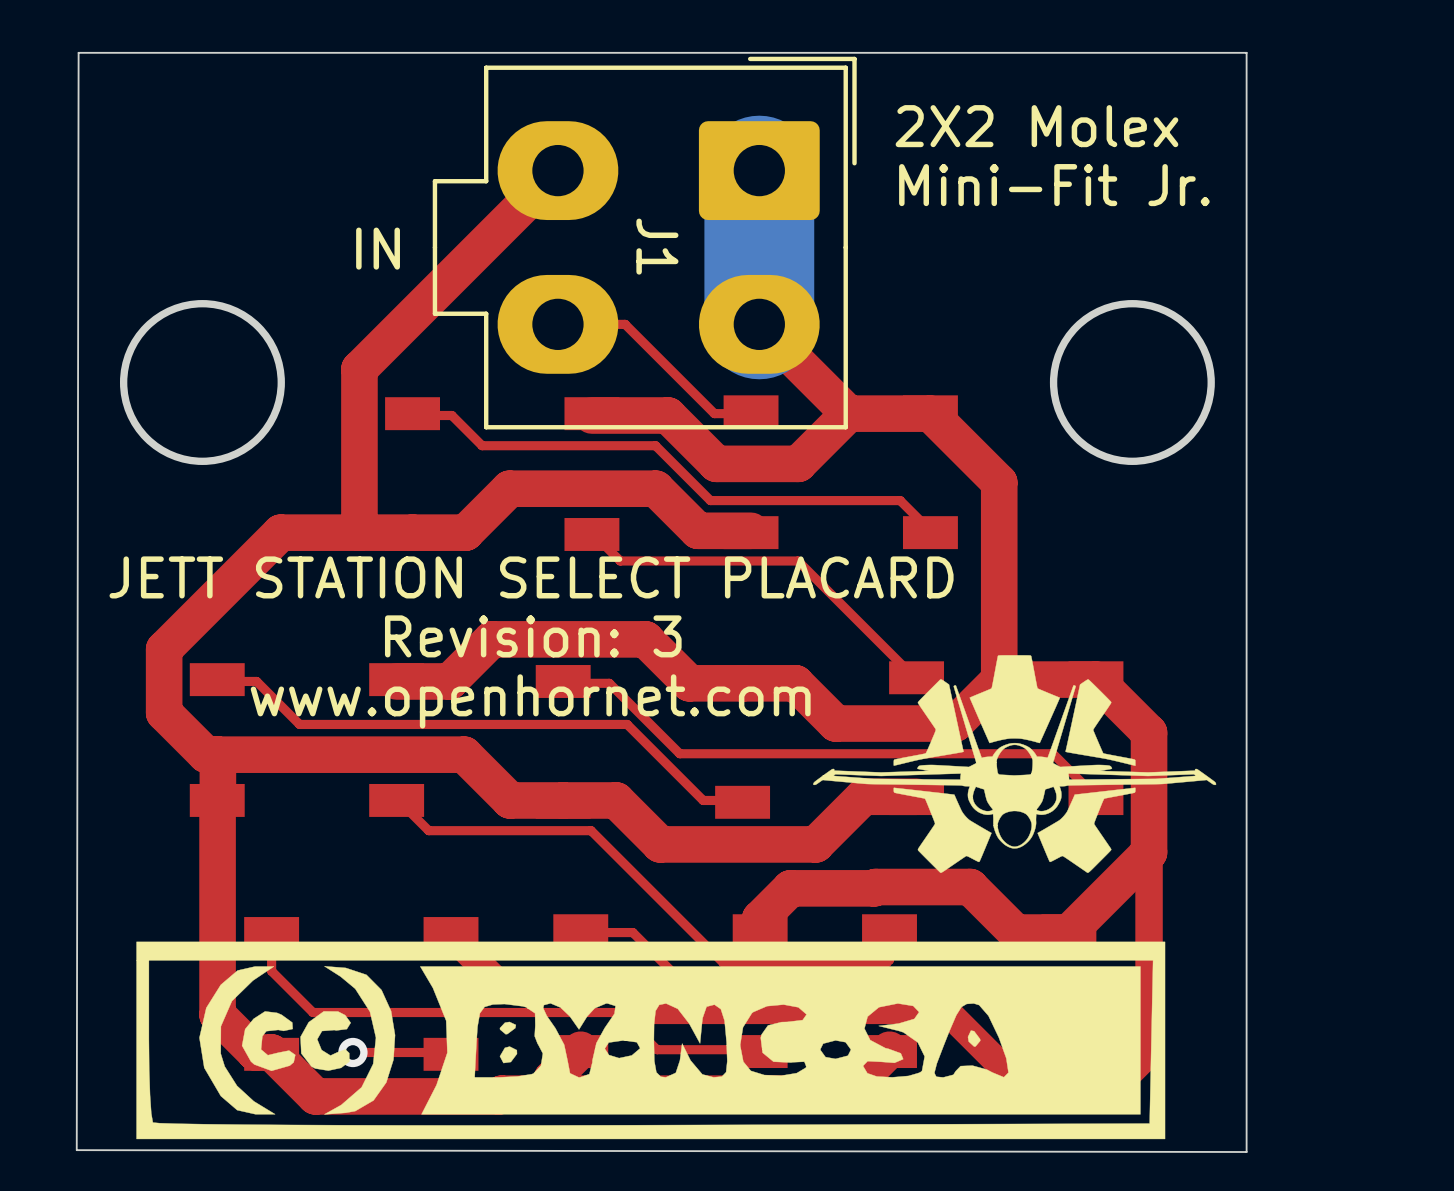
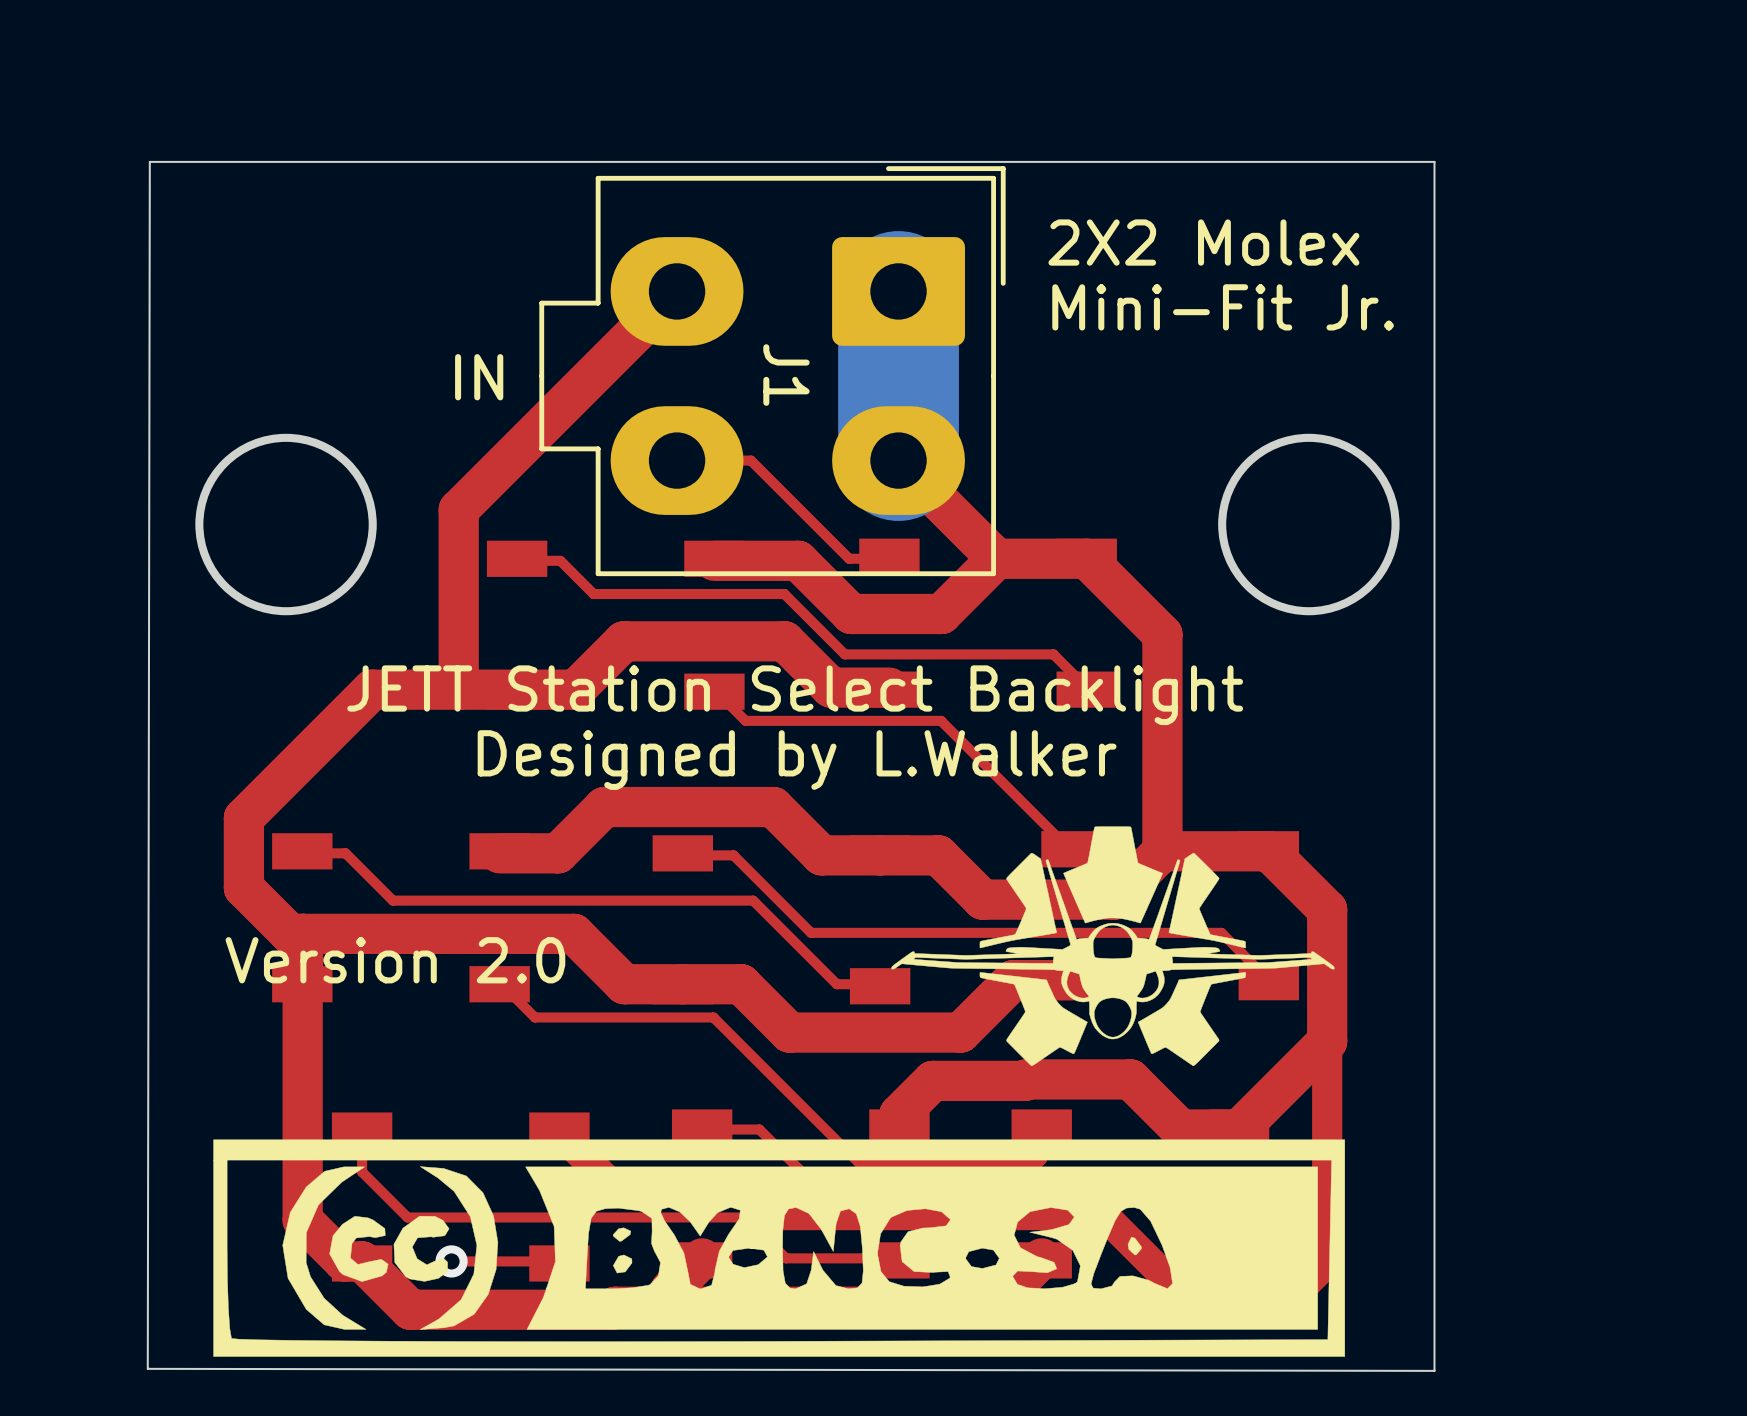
text: none -> JETT Station Select Backlight (795, 695)
text: JETT STATION SELECT PLACARD (531, 577) -> none
text: none -> Designed by L.Walker (797, 760)
text: Revision: 3 (533, 636) -> none
text: www.openhornet.com (530, 701) -> none
drawing position: (1014, 764) -> (1112, 946)
text: none -> Version 2.0 (395, 960)

